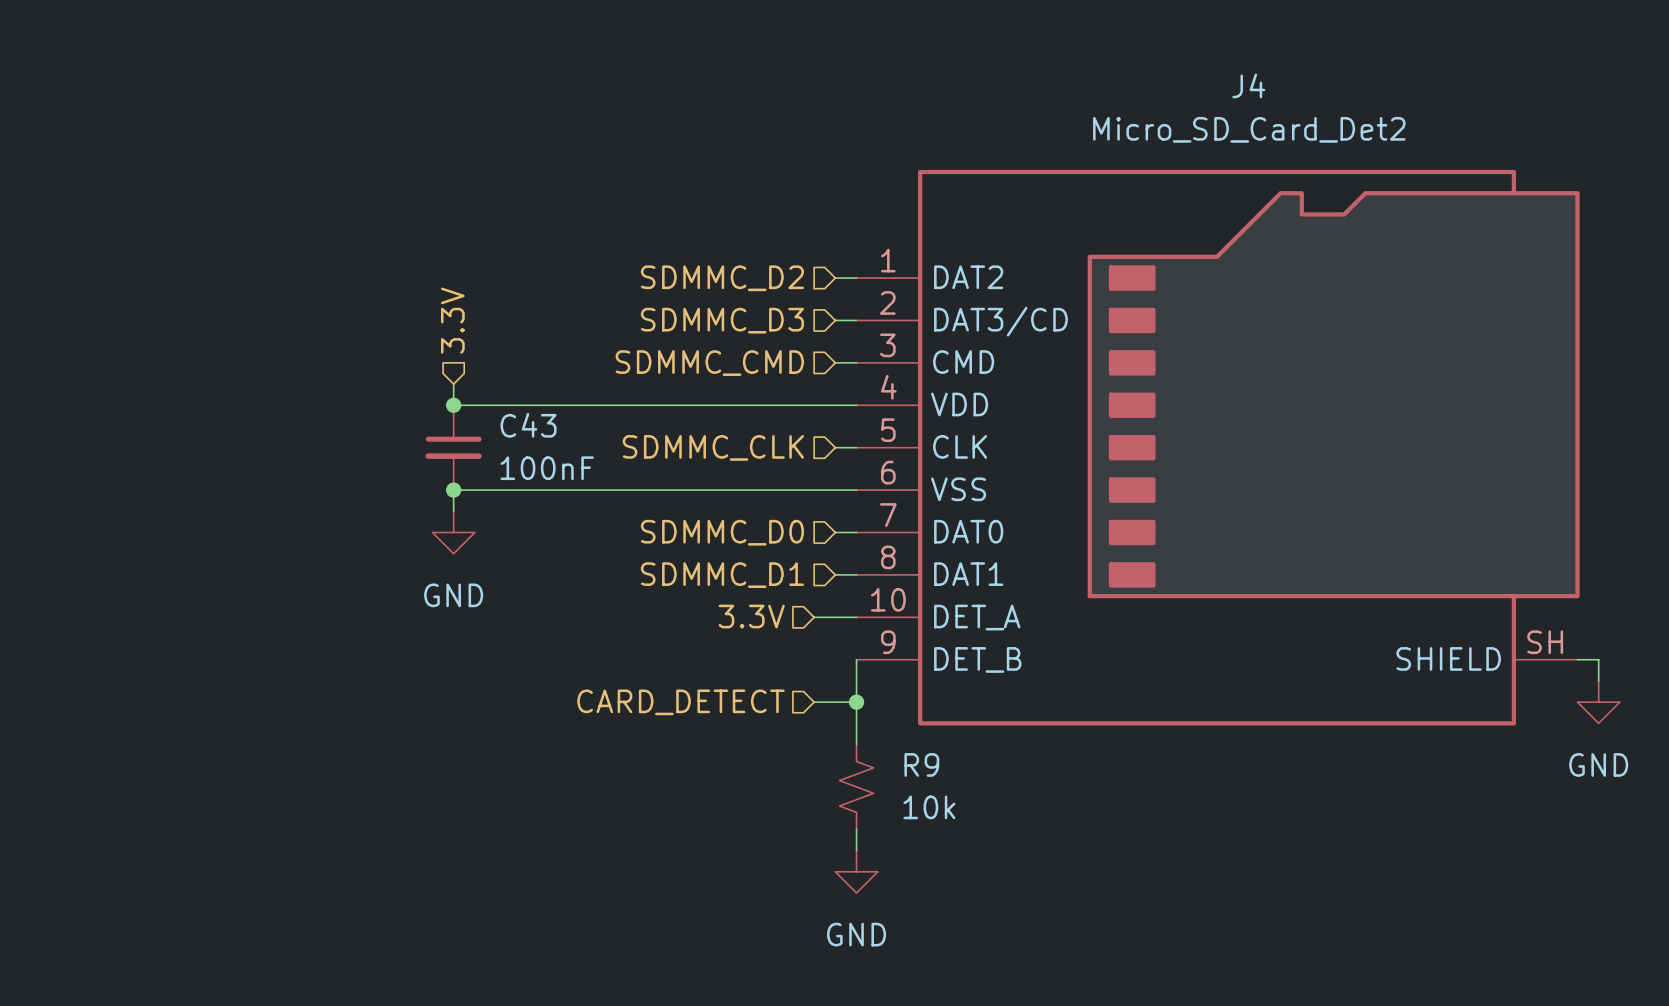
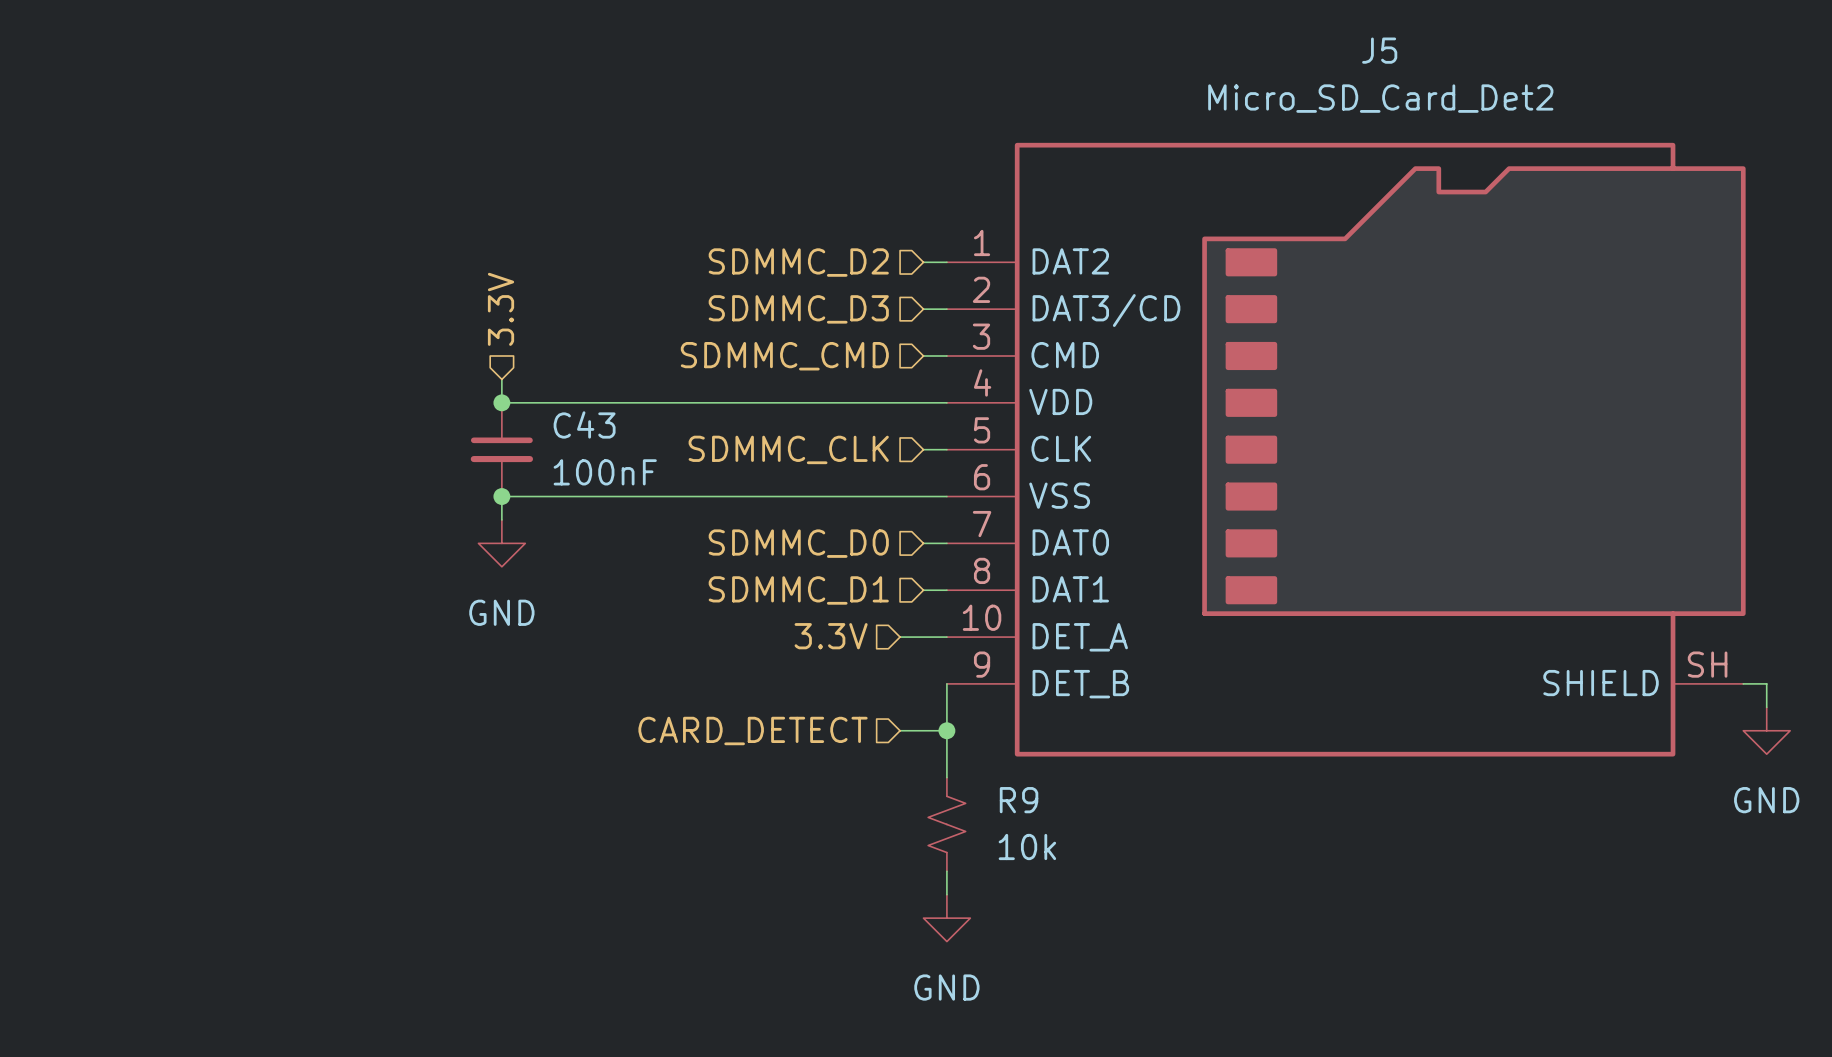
J4 name: J4 (1248, 85) -> J5 (1379, 50)

